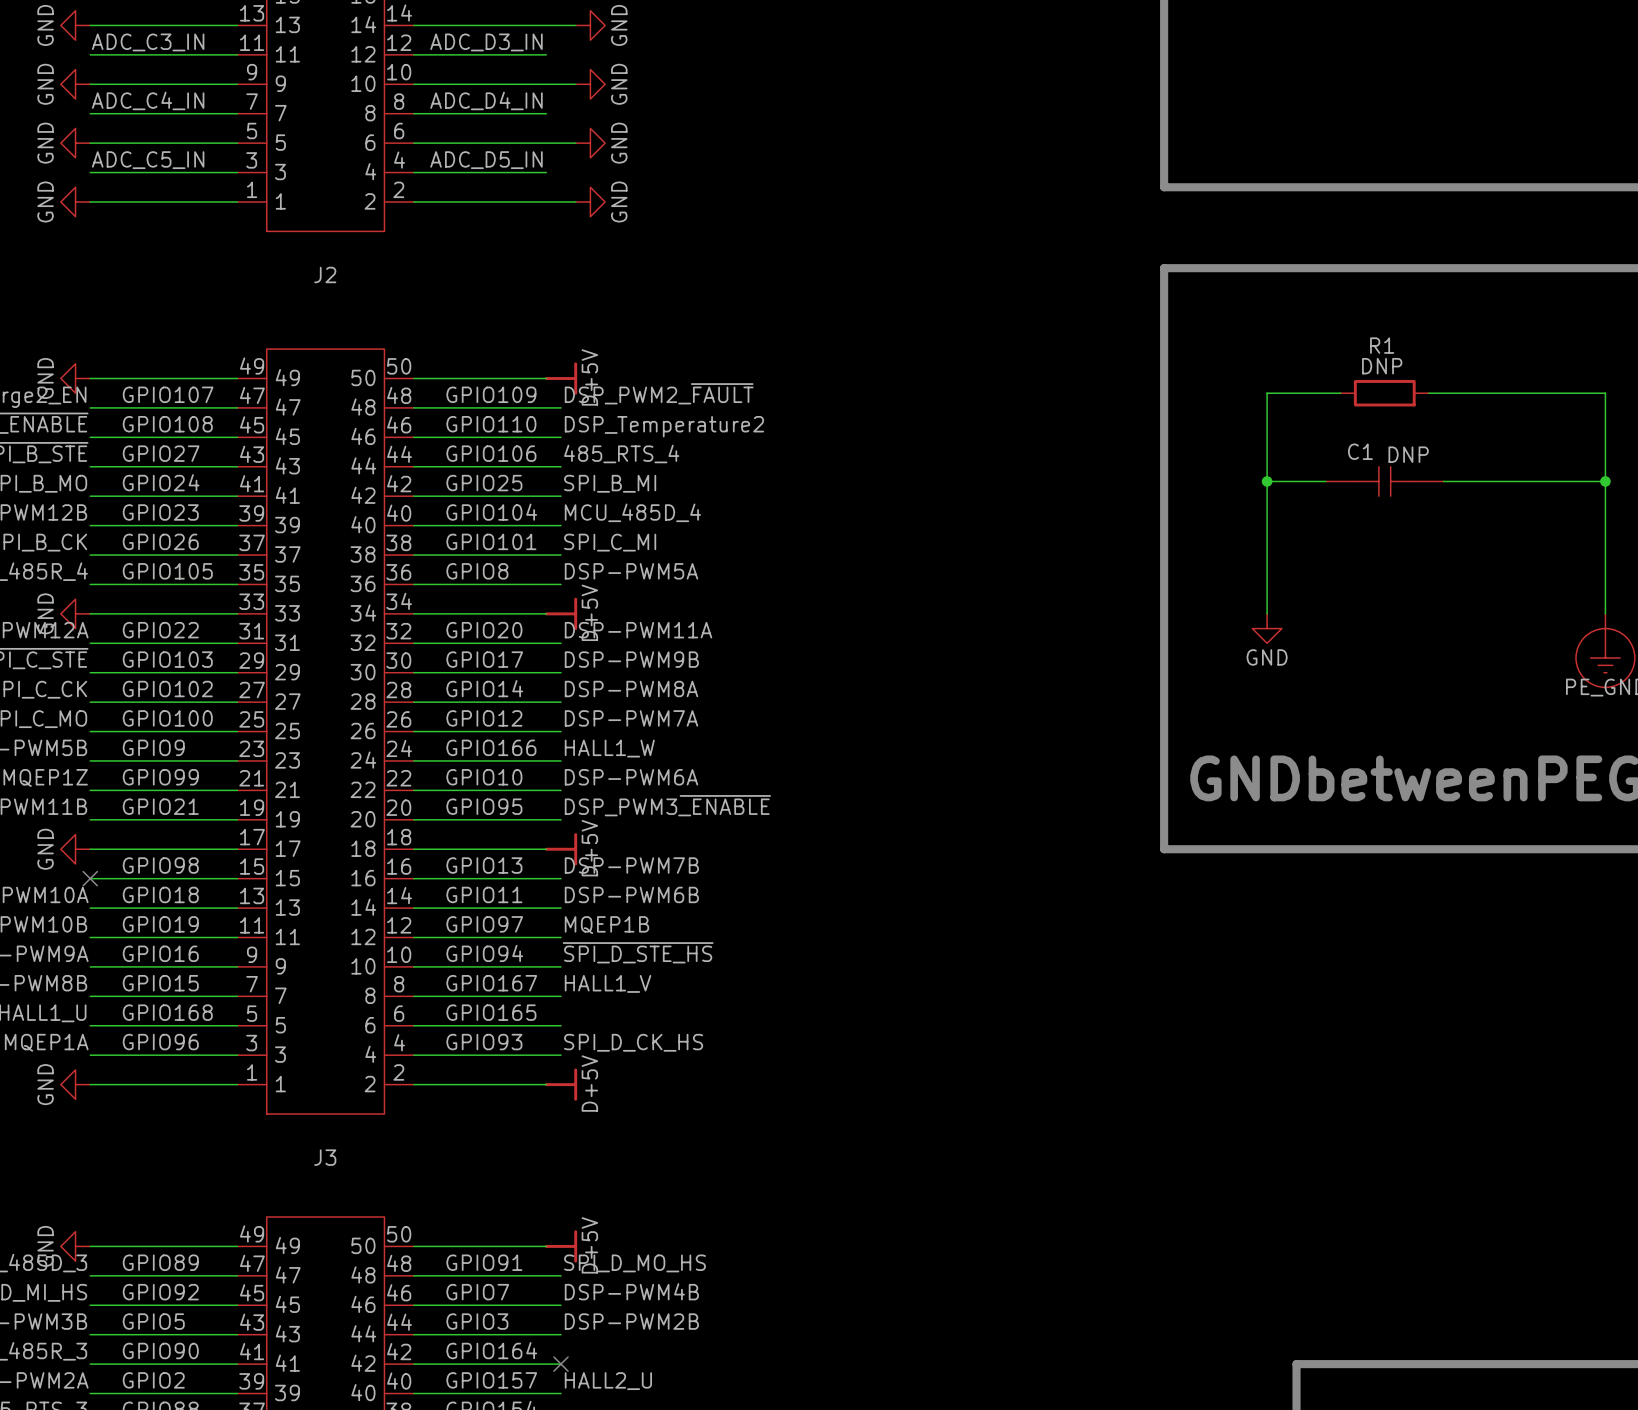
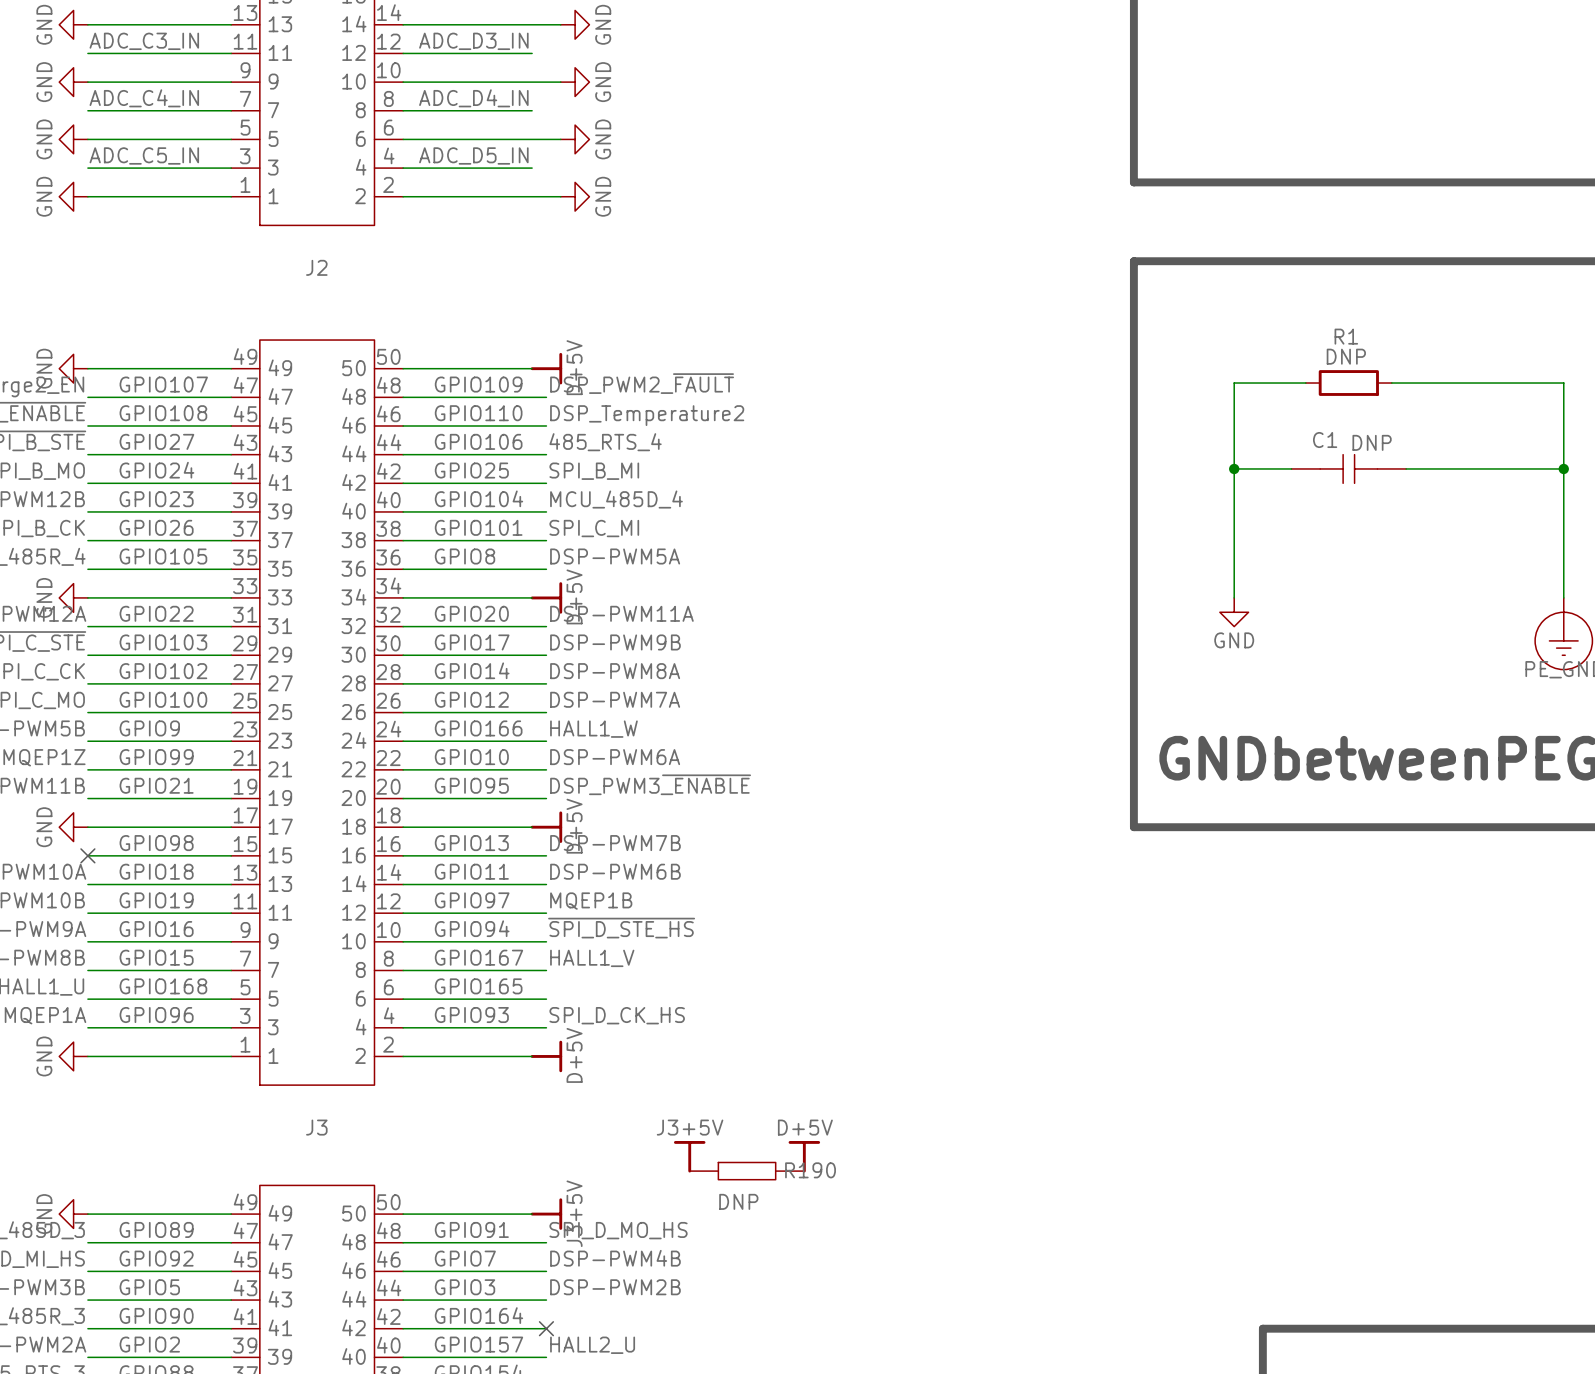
power symbol: none -> J3+5V (689, 1156)
power symbol: none -> D+5V (804, 1156)
R190: none -> DNP (747, 1171)
power symbol: D+5V (560, 1246) -> J3+5V (546, 1214)

